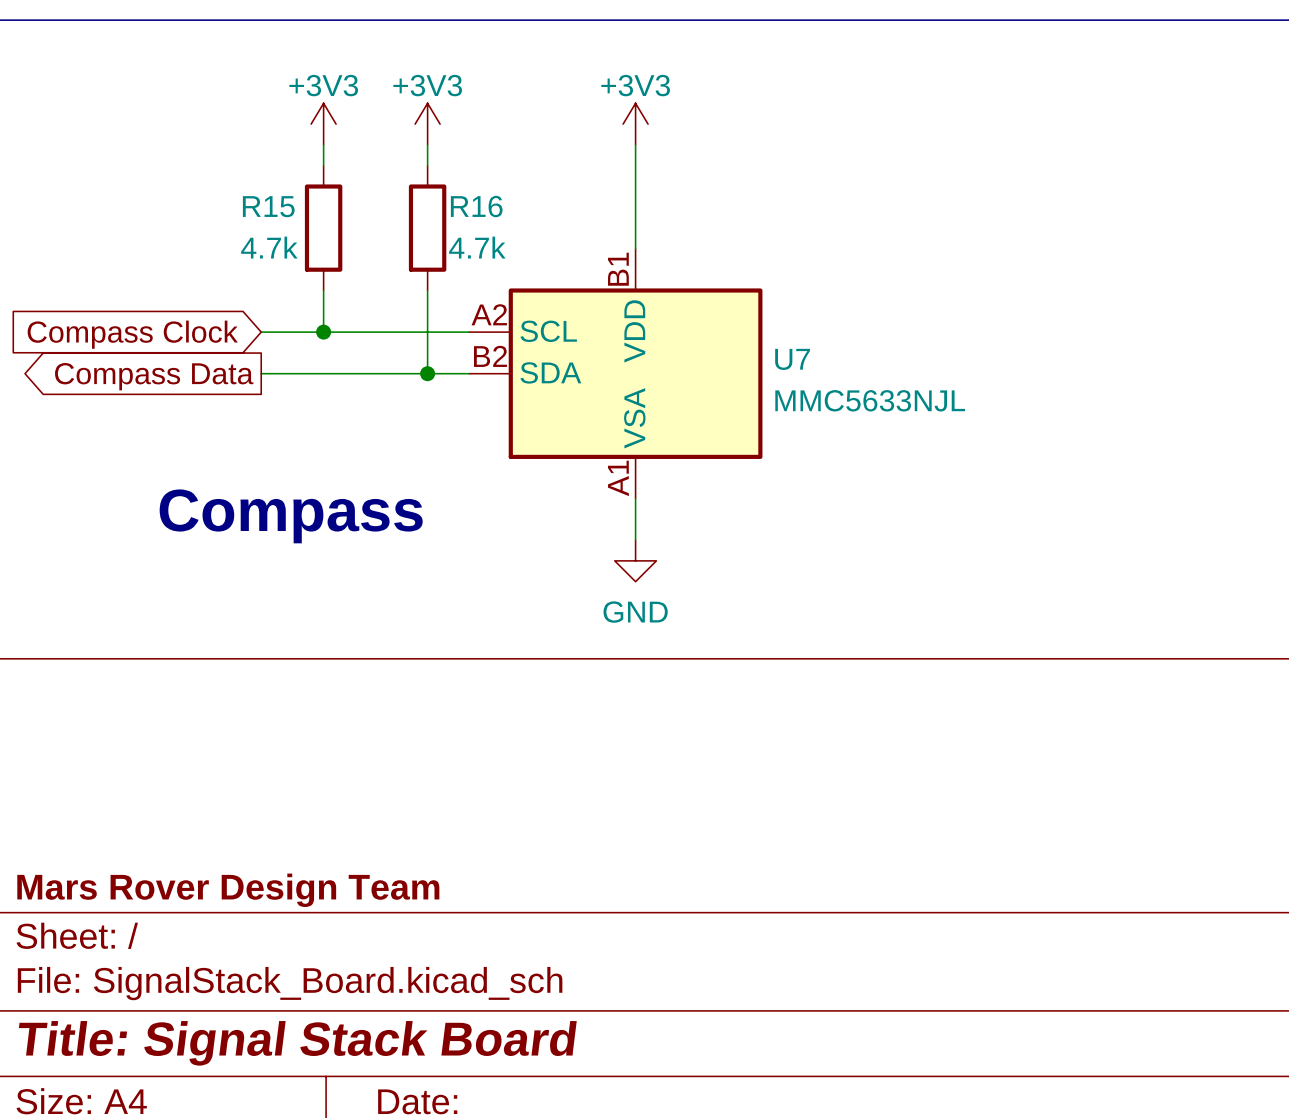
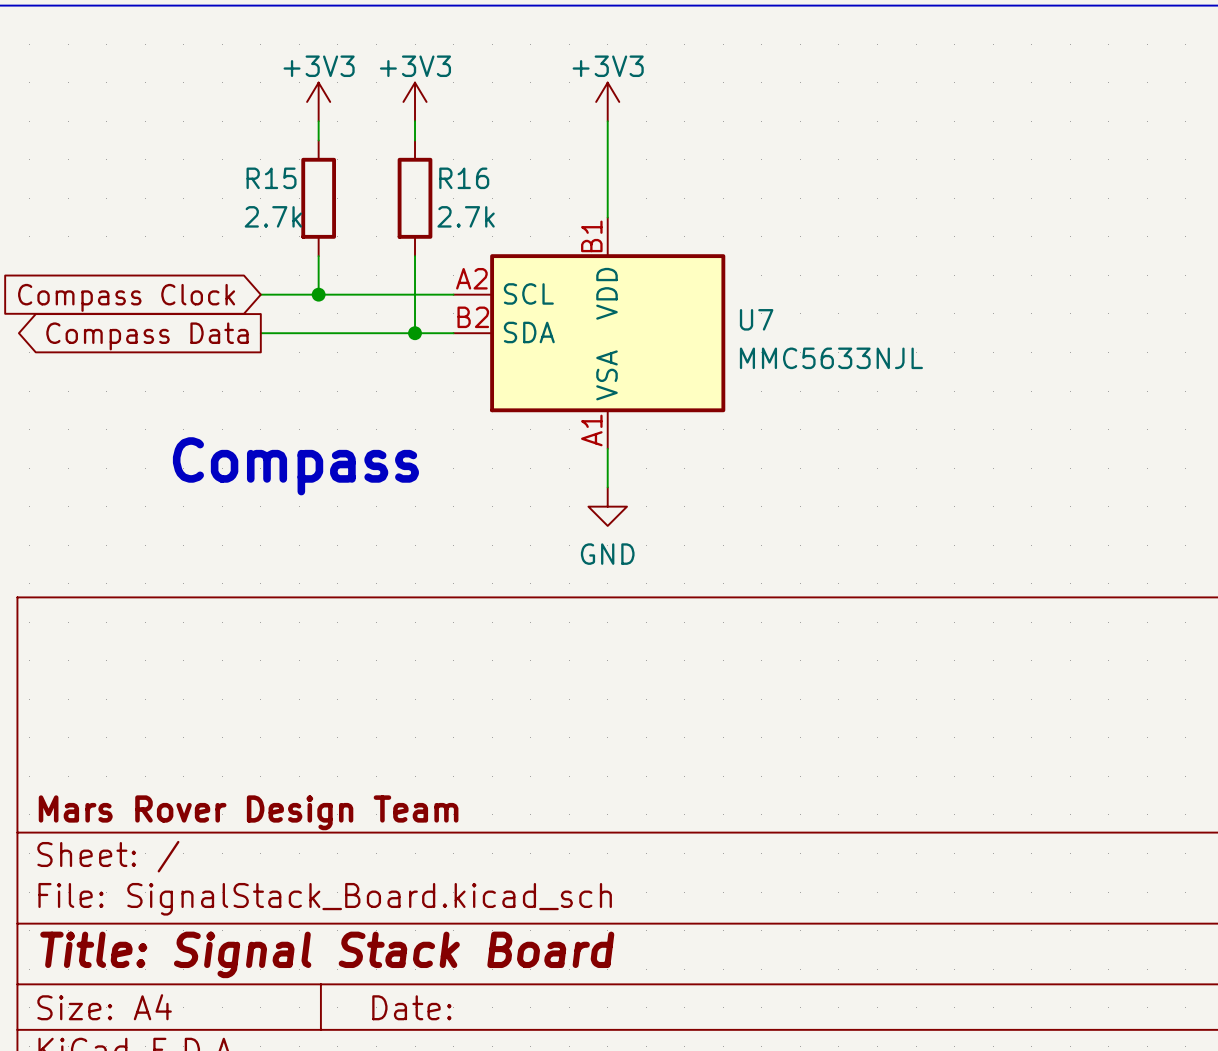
R15 value: 4.7k (269, 247) -> 2.7k (273, 216)
R16 value: 4.7k (477, 247) -> 2.7k (466, 216)

